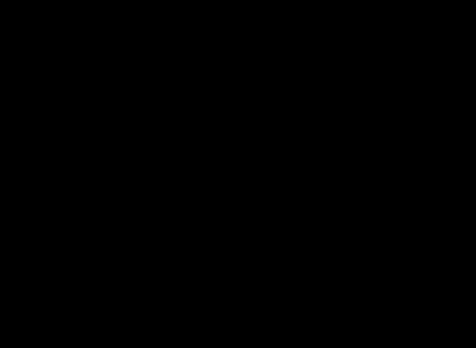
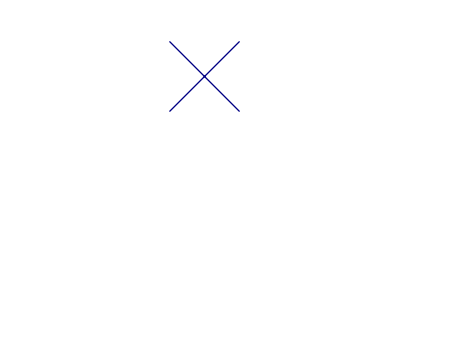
no-connect mark: none -> (204, 76)

